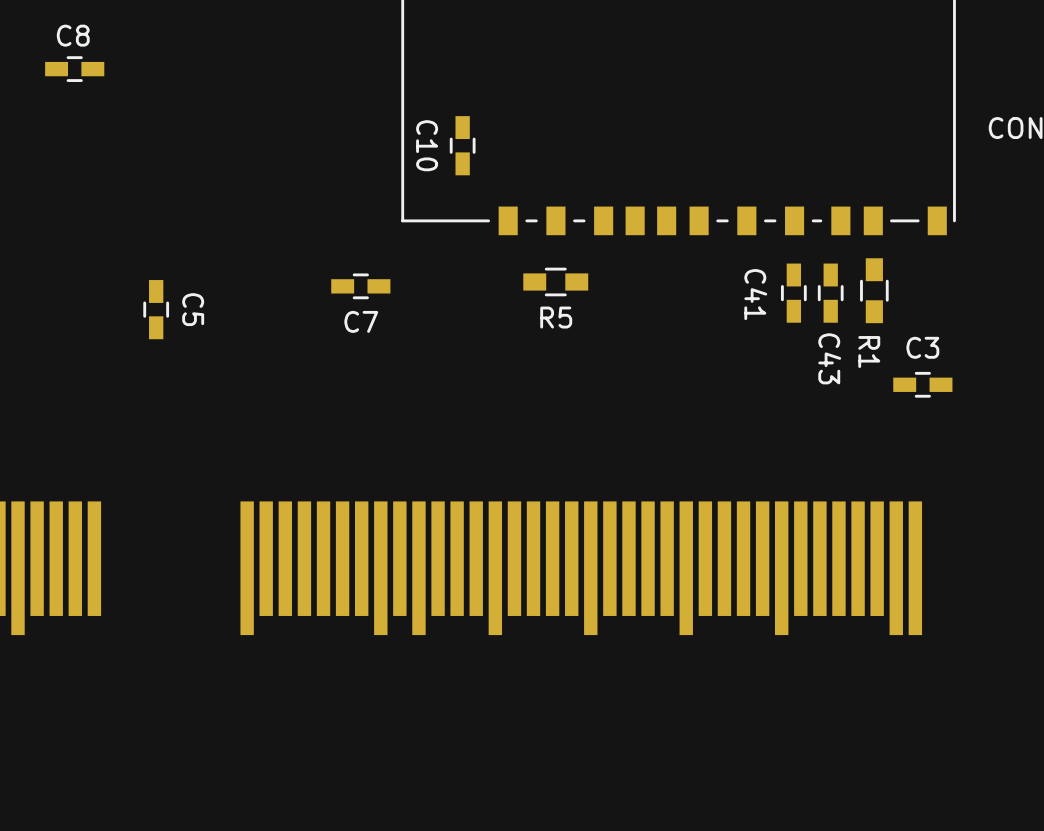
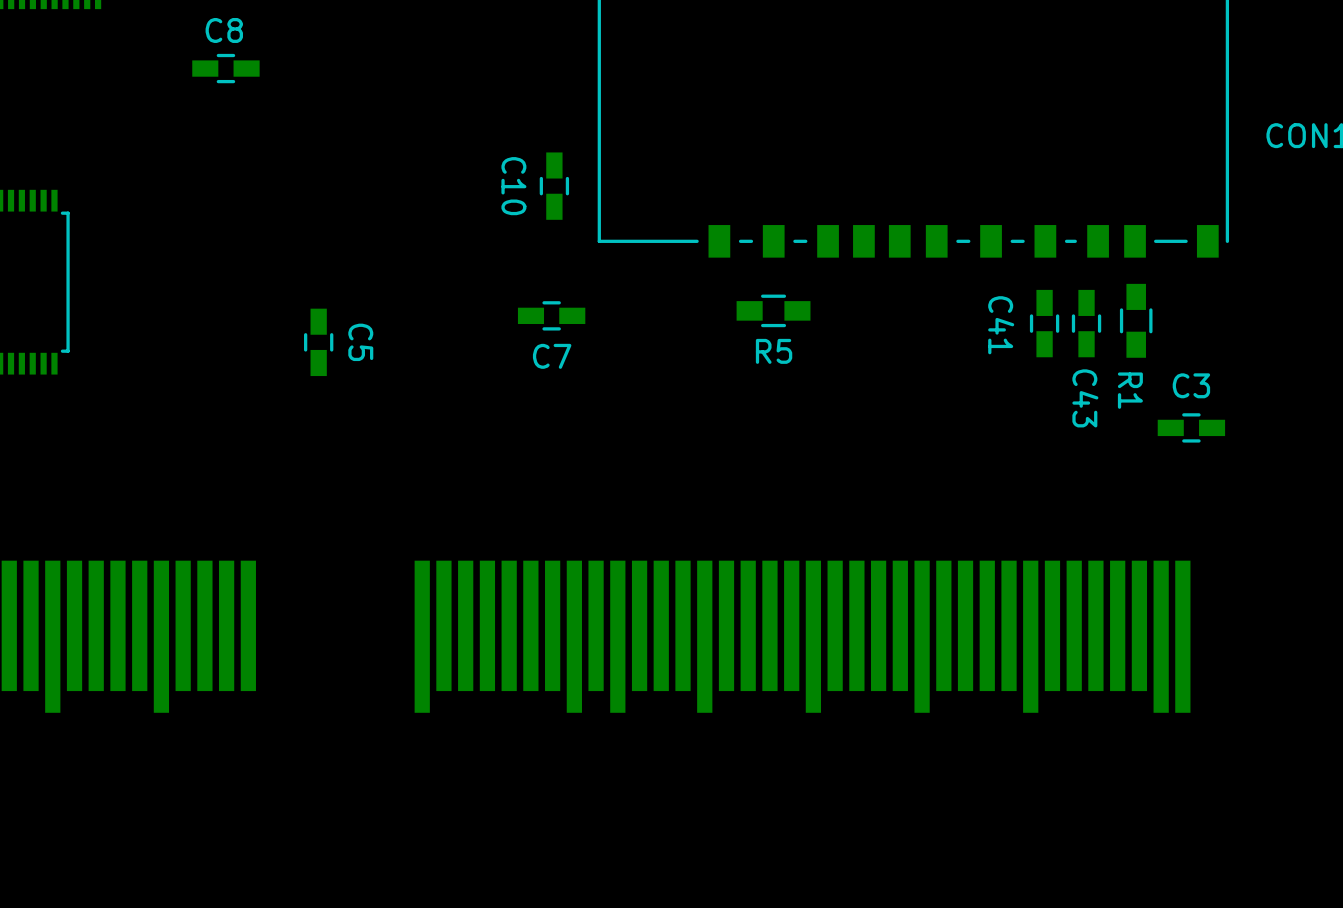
C10 position: (462, 145) -> (554, 186)

